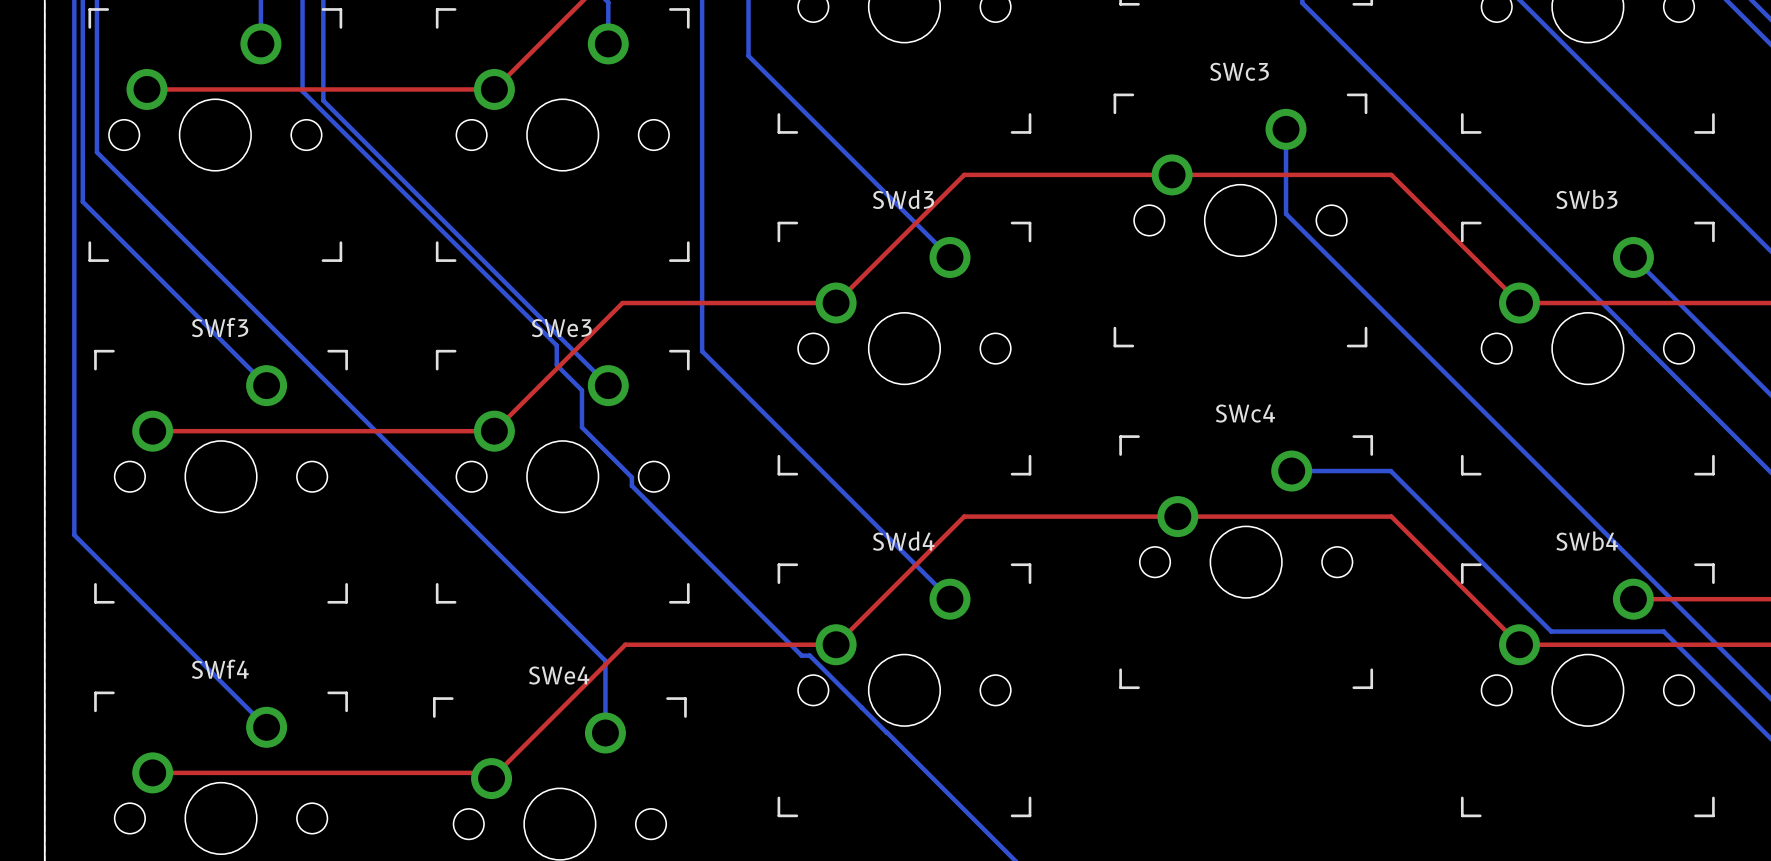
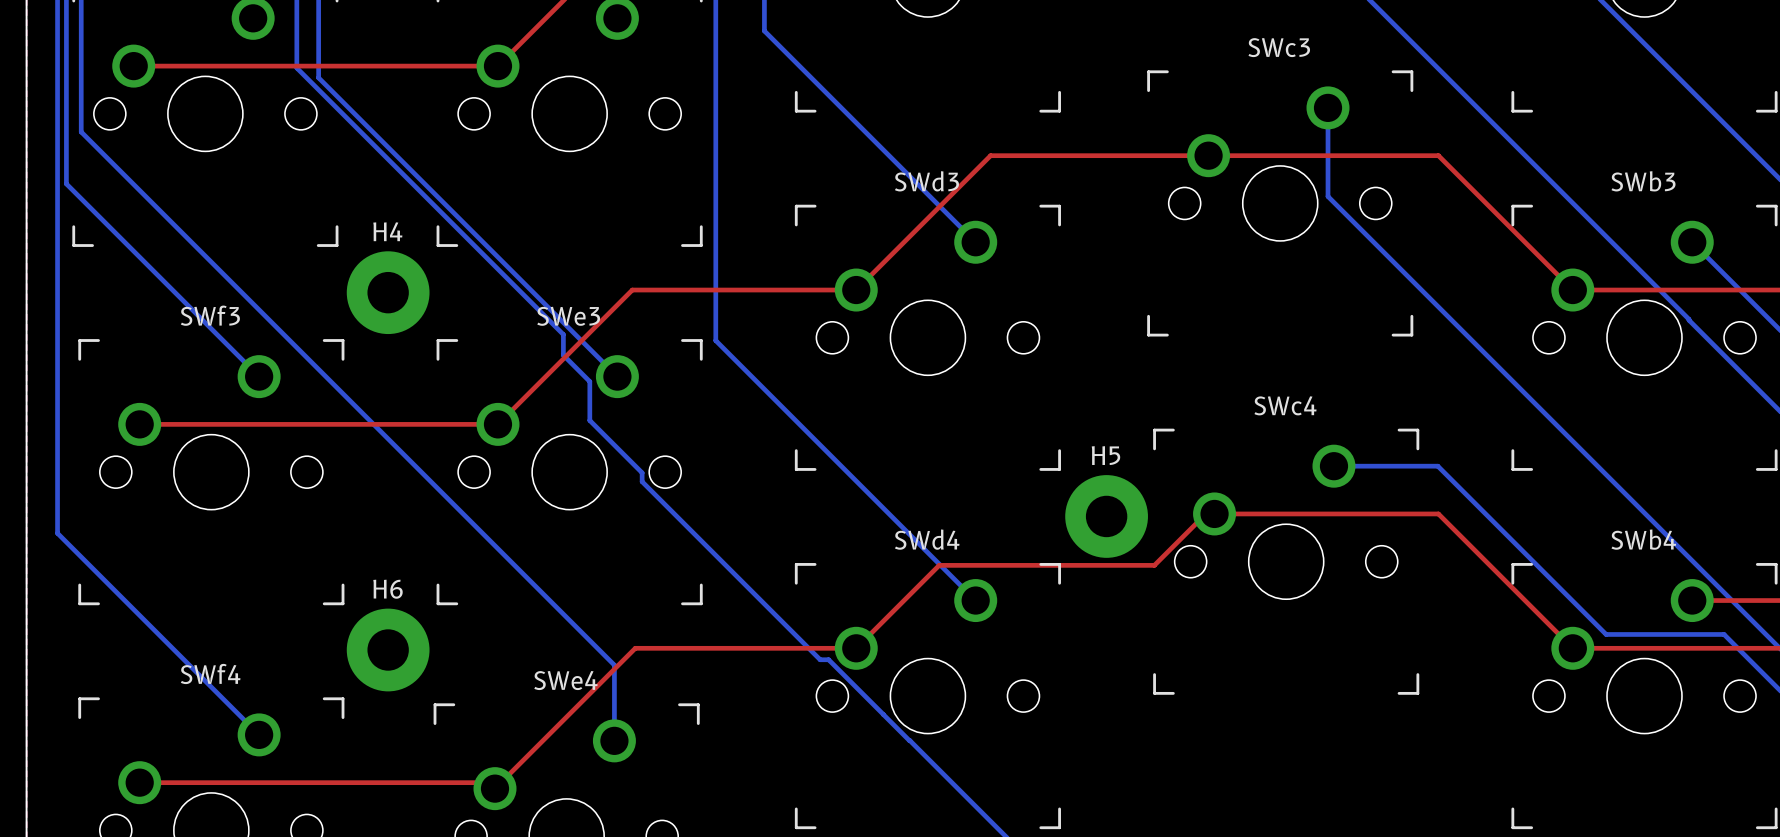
H4: none -> (388, 292)
top track: (1169, 516) (964, 516) (915, 565) -> (1205, 513) (1154, 565) (939, 565)
H5: none -> (1106, 516)
H6: none -> (388, 650)

